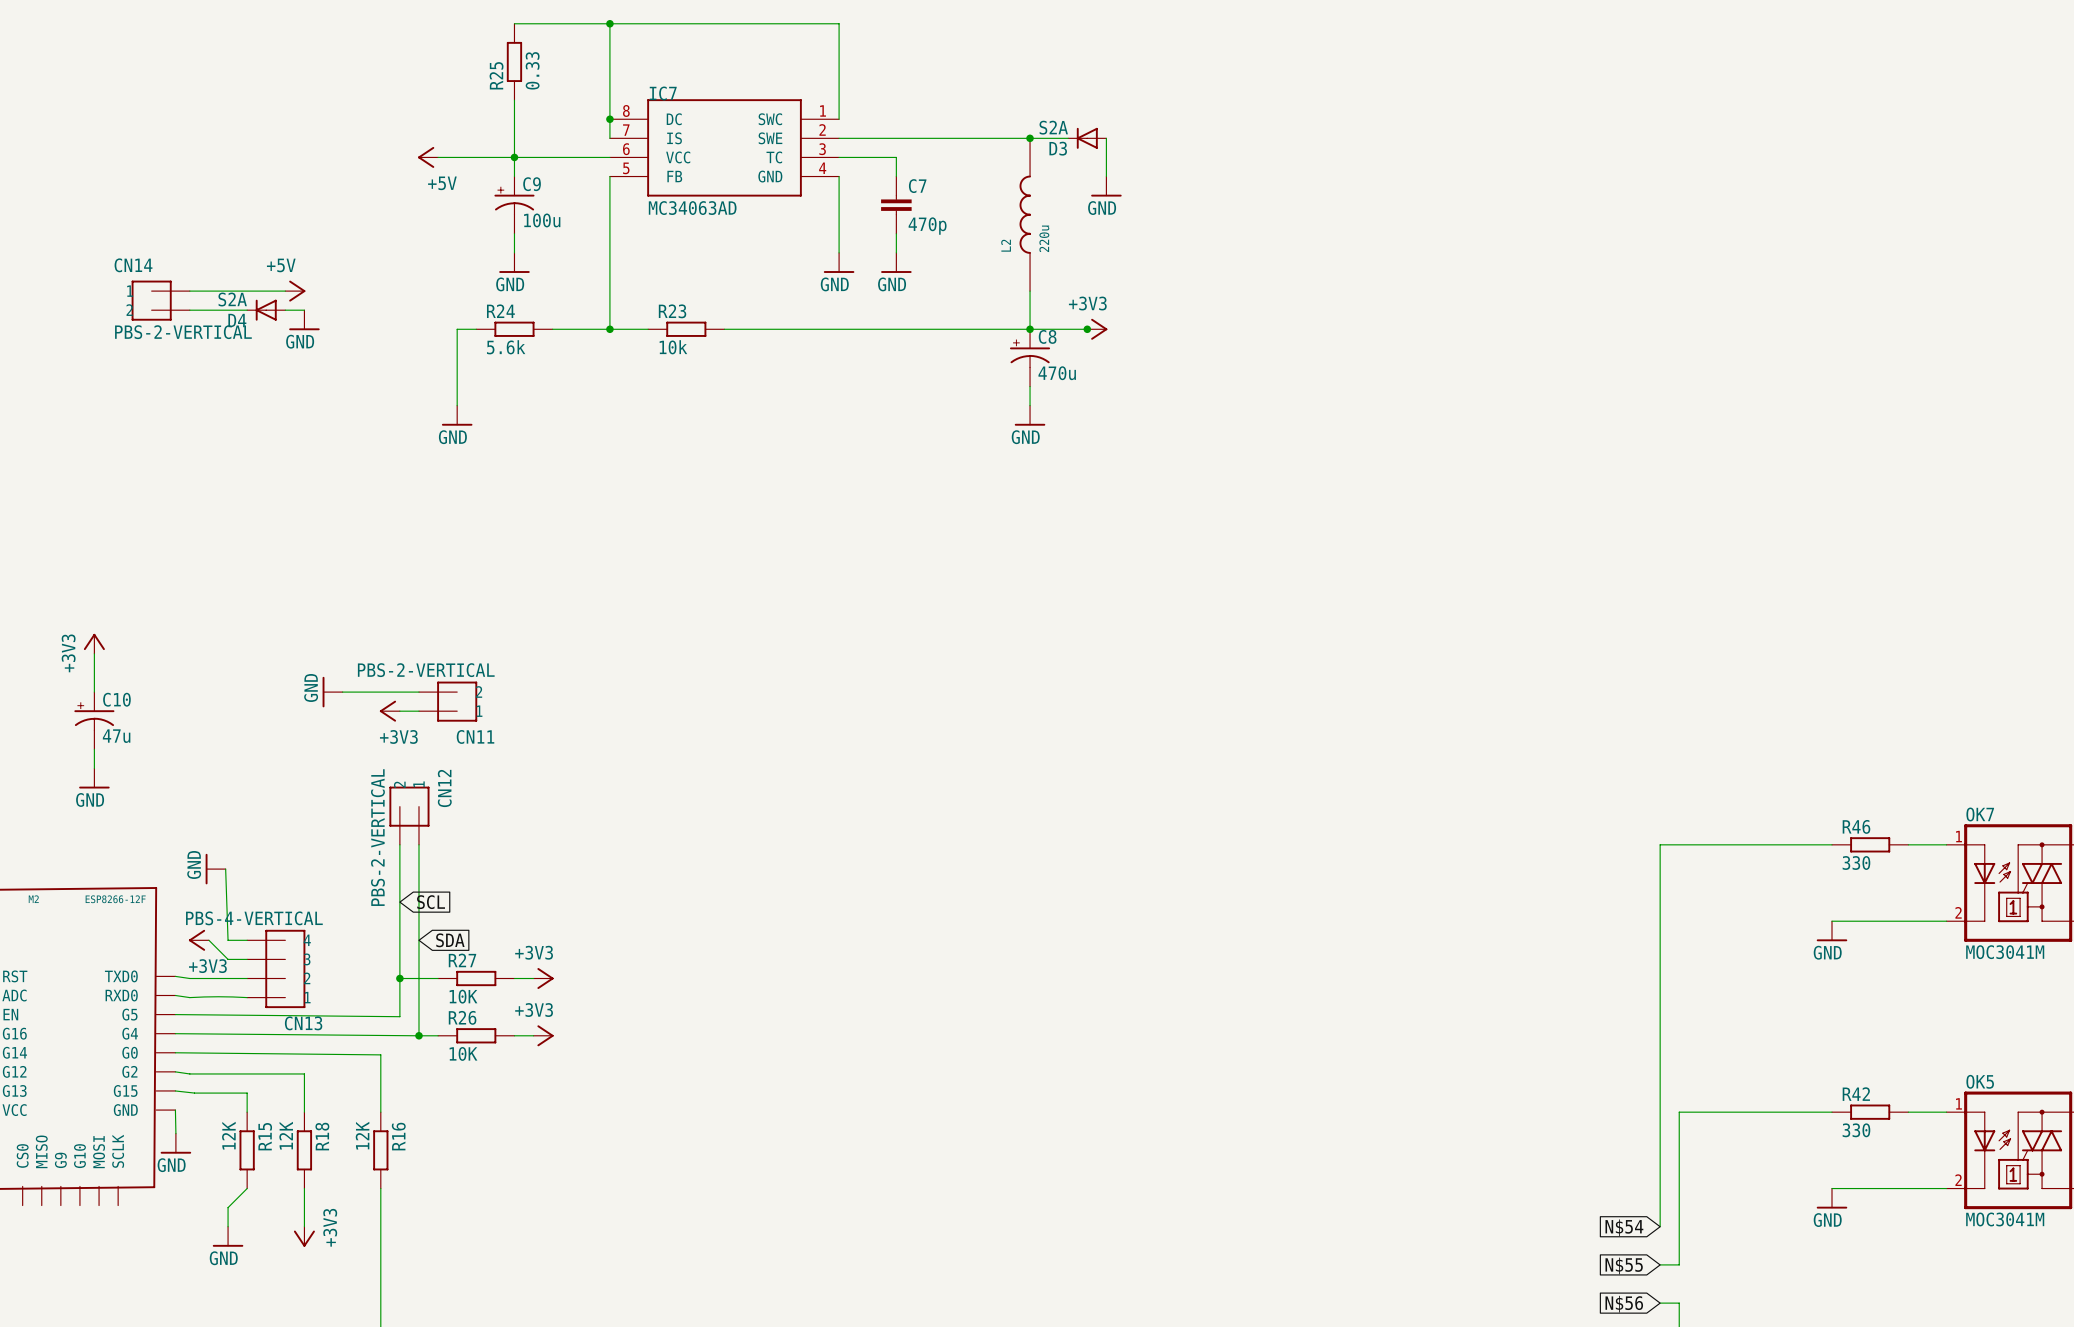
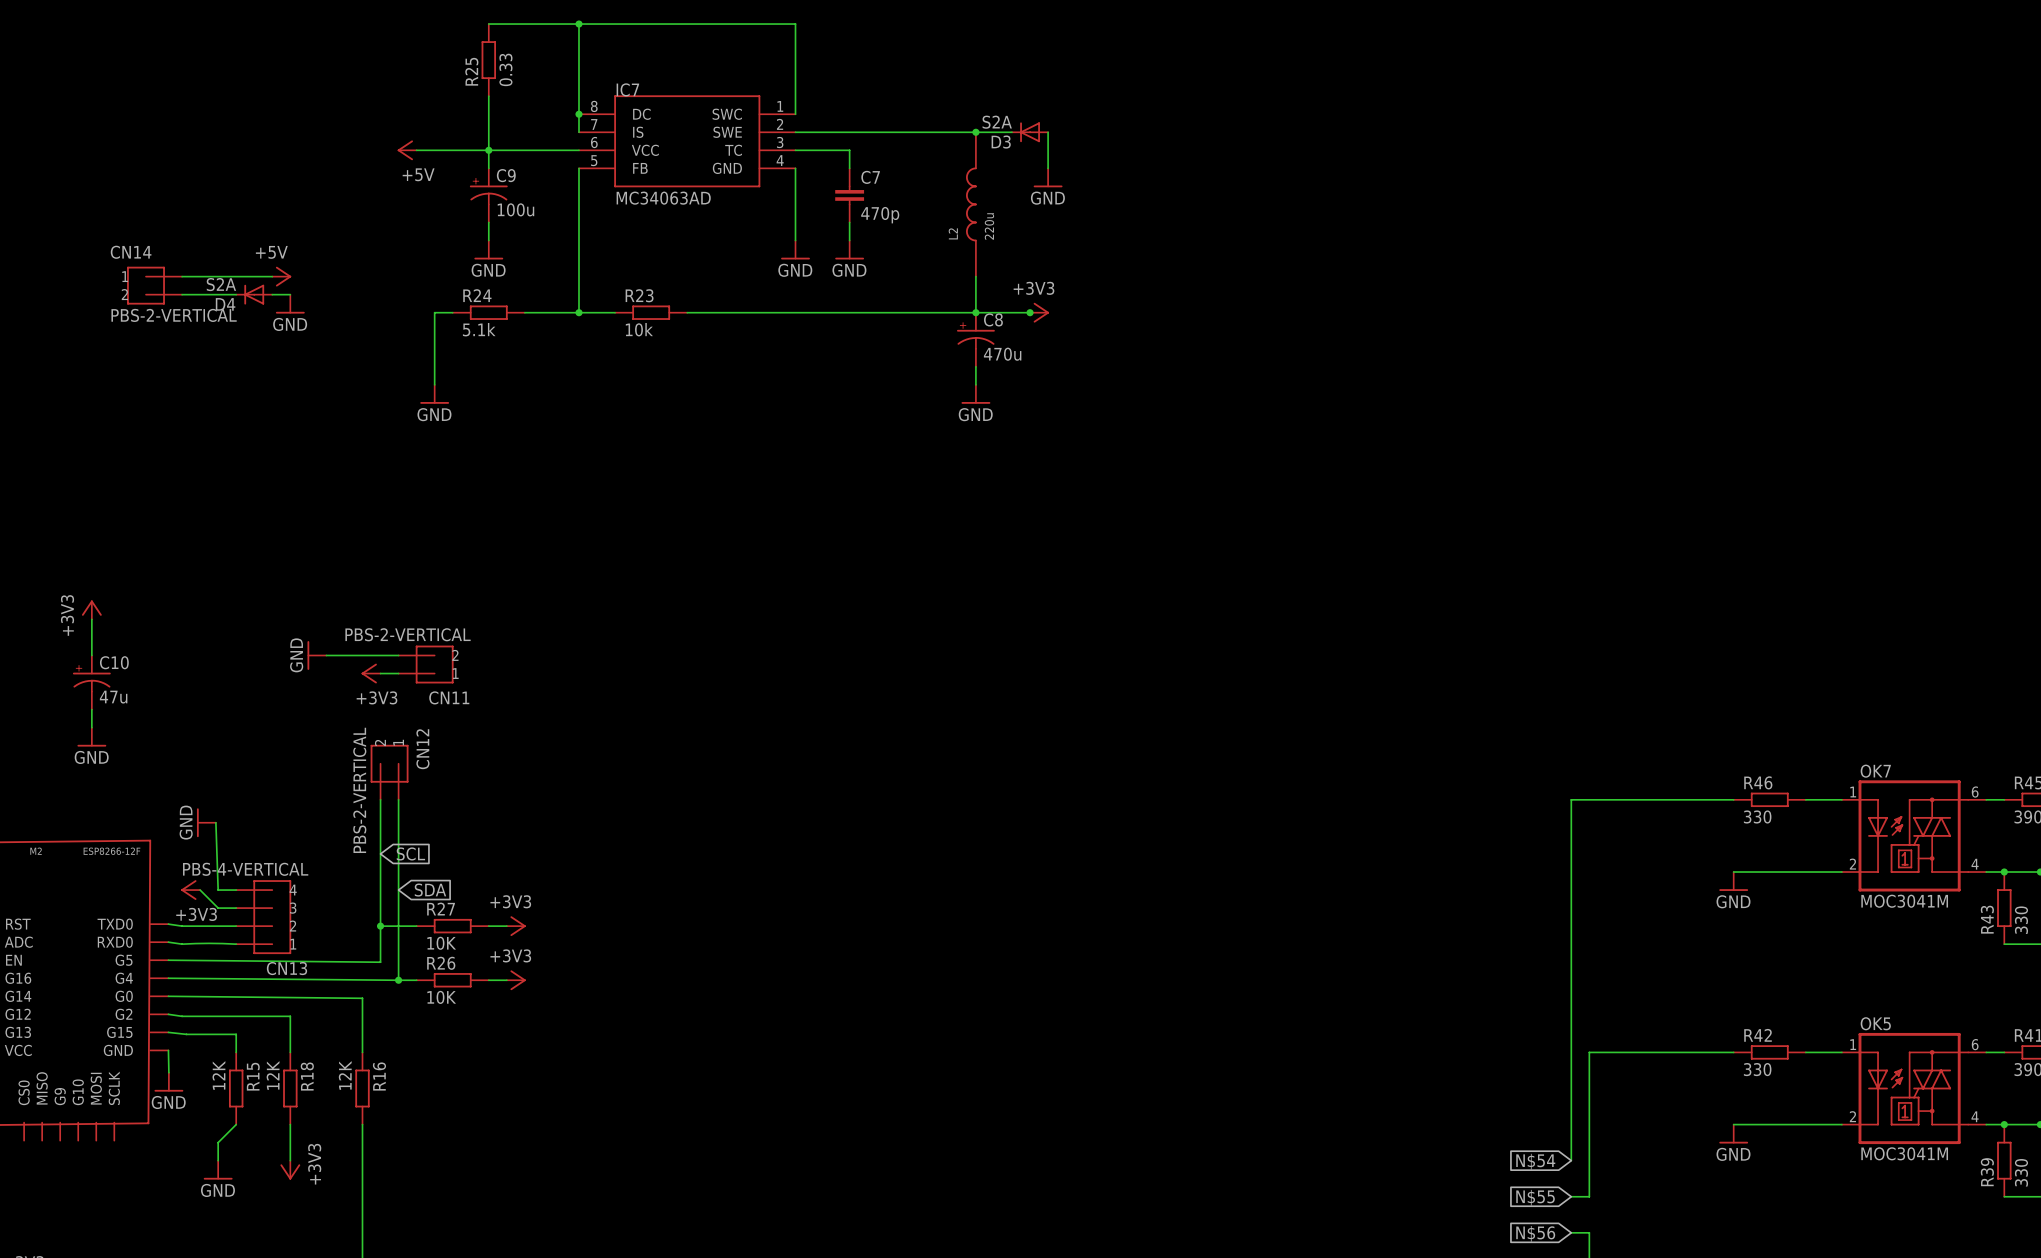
R24 value: 5.6k (506, 347) -> 5.1k (479, 329)

